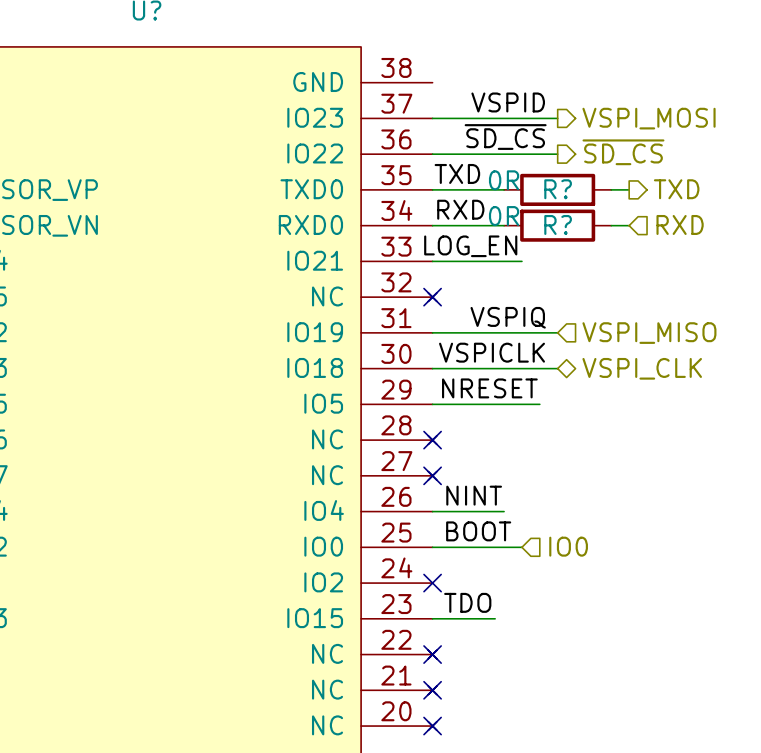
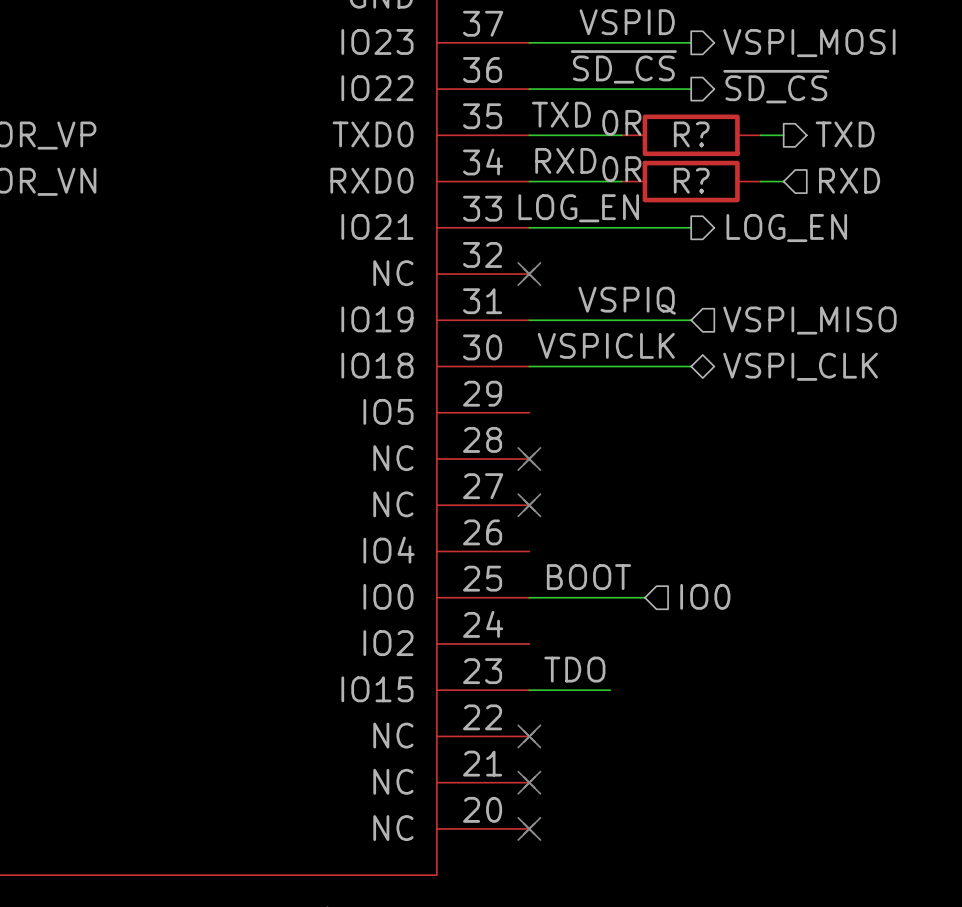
wire: none -> (644, 227) (691, 227)
hierarchical label: none -> LOG_EN (786, 228)
label: NRESET (489, 388) -> none
wire: (432, 404) (539, 404) -> none
label: NINT (474, 495) -> none
wire: (432, 511) (504, 511) -> none
no-connect mark: (432, 583) -> none

